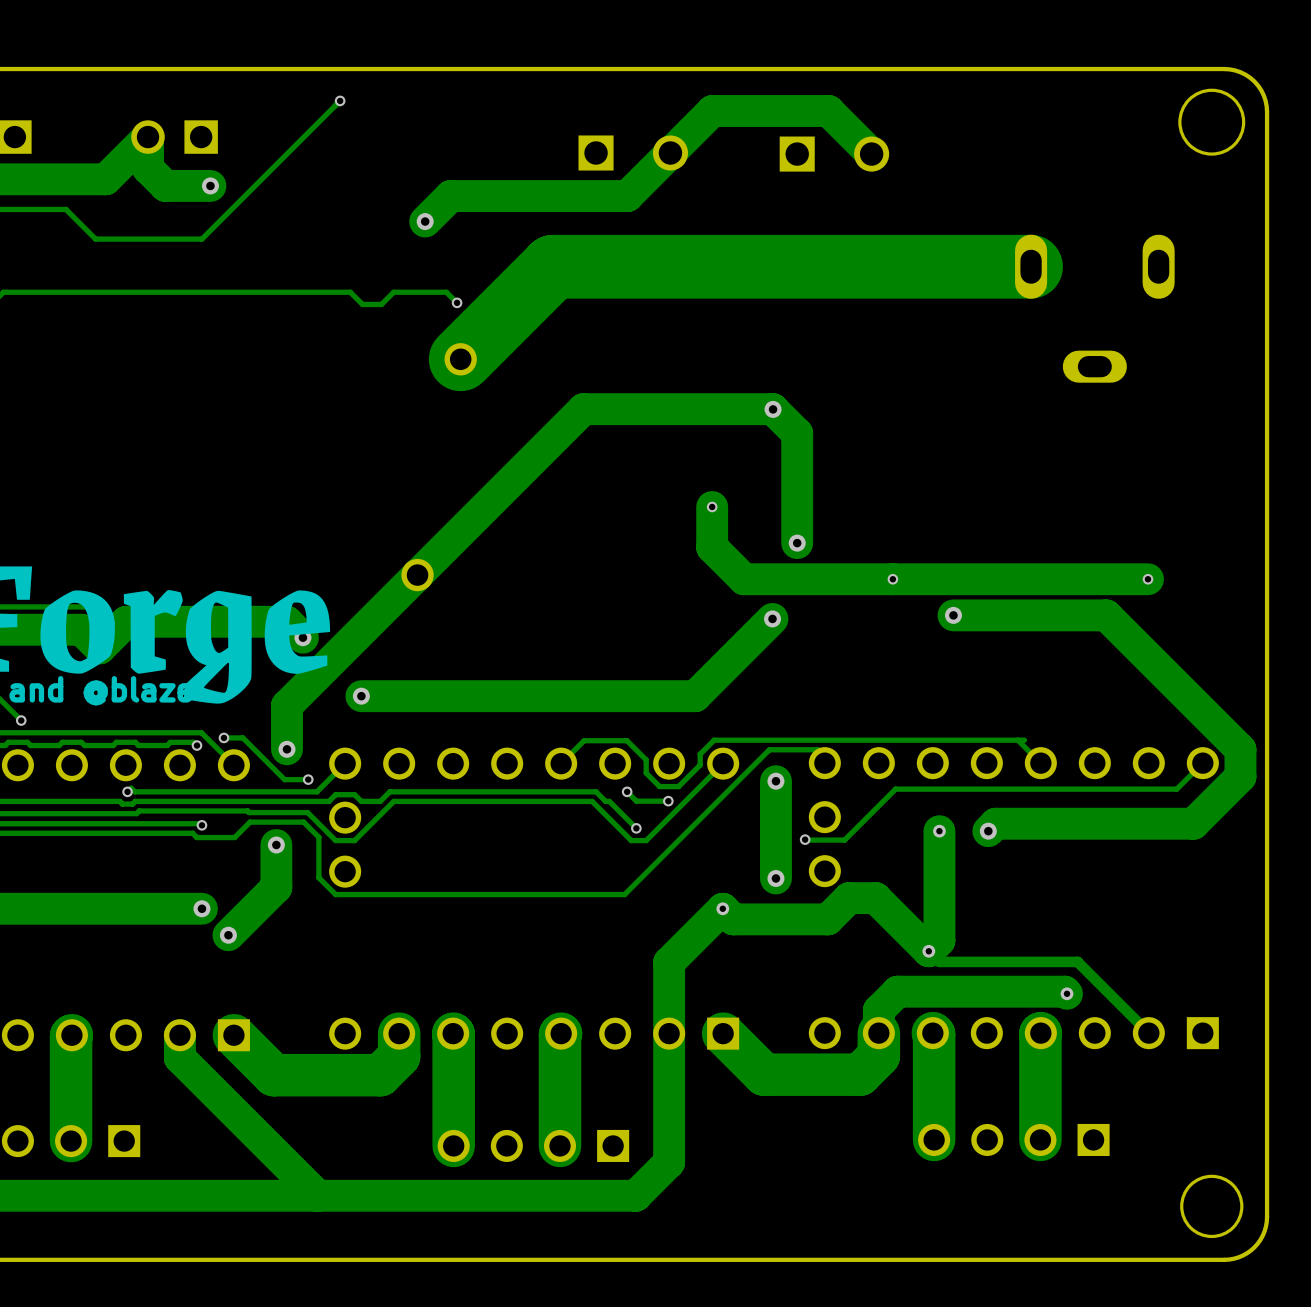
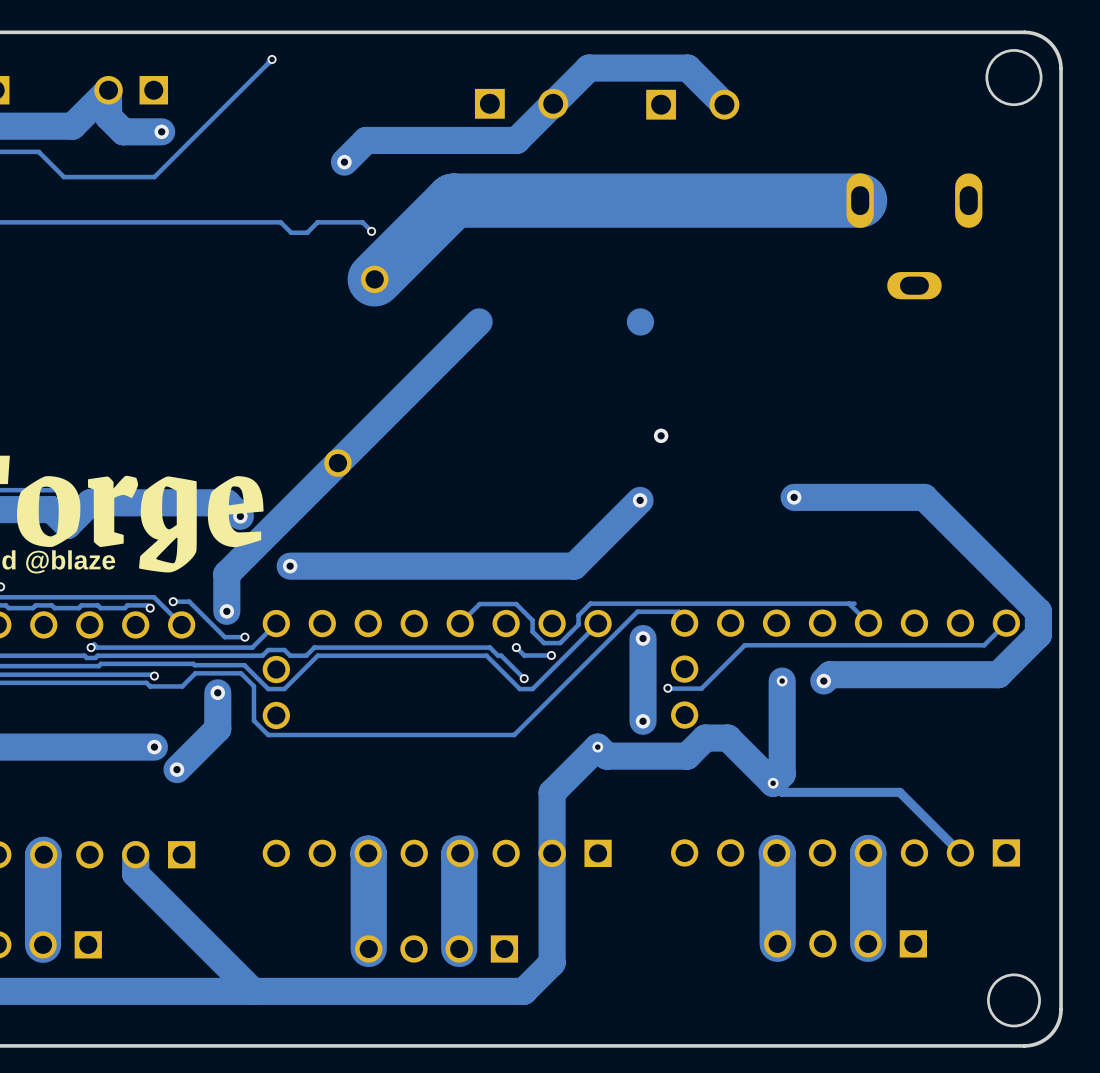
track: (772, 409) (583, 409) -> none
track: (773, 409) (797, 433) (797, 543) -> none
via: (773, 409) -> none
track: (712, 506) (712, 547) (744, 579) (1148, 579) -> none
via: (712, 506) -> none
via: (892, 579) -> none
via: (1148, 579) -> none
track: (1067, 993) (1064, 991) (897, 991) (878, 1010) (878, 1055) (859, 1074) (764, 1074) (723, 1033) -> none
via: (1067, 993) -> none
track: (399, 1033) (399, 1056) (380, 1075) (273, 1075) (233, 1035) -> none

